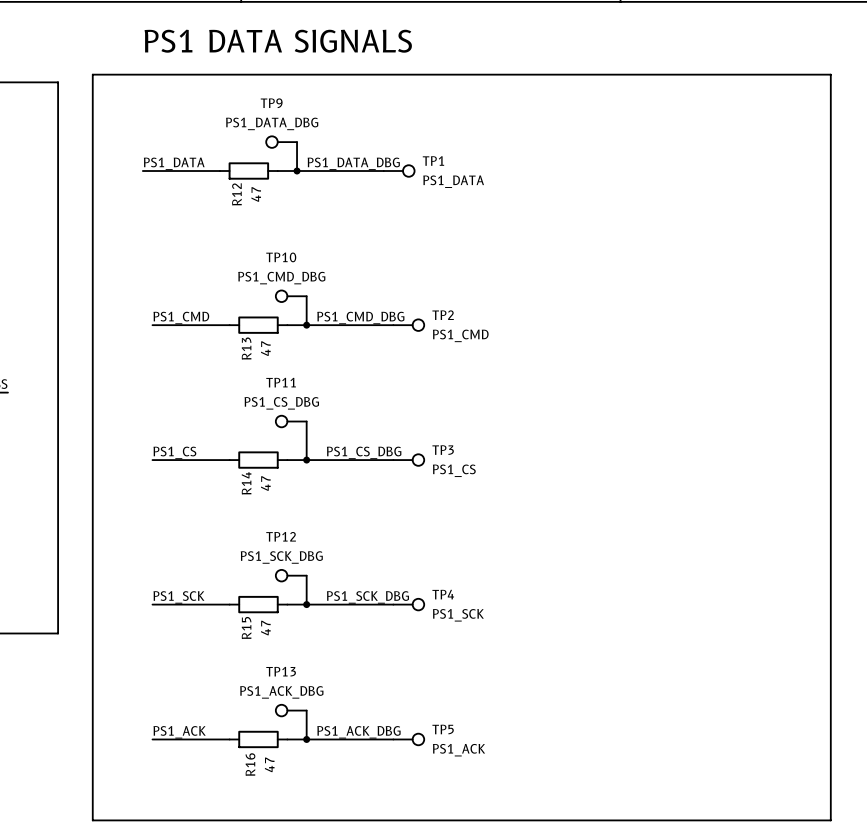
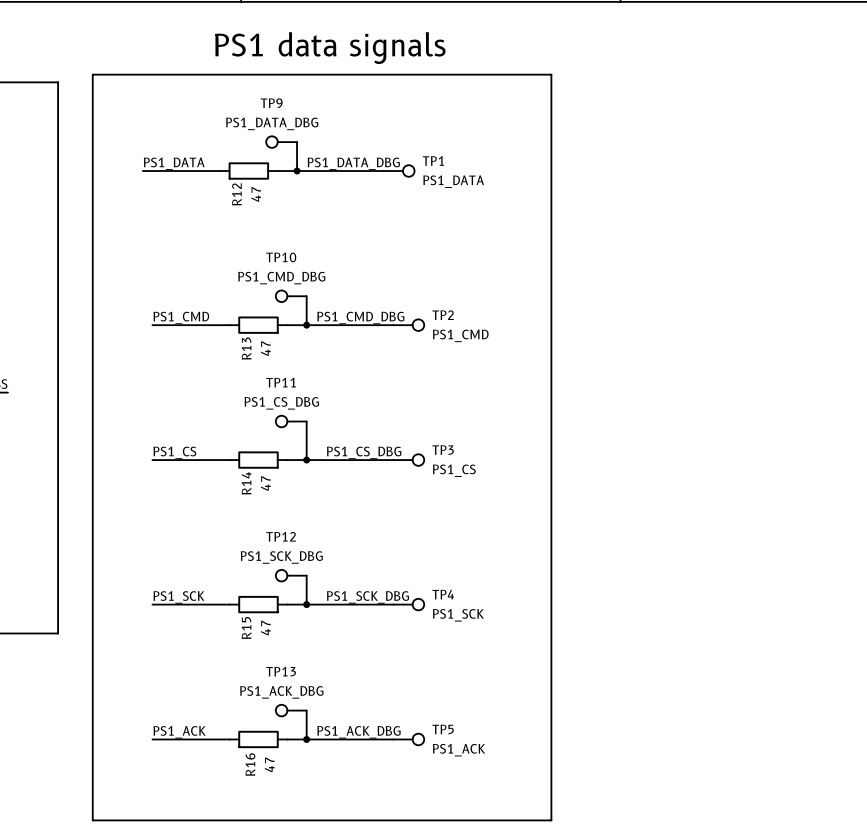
text: PS1 DATA SIGNALS (278, 41) -> none
text: none -> PS1 data signals (330, 48)
line: (551, 74) (830, 74) (830, 820) (551, 820) -> (551, 74) (551, 820)

